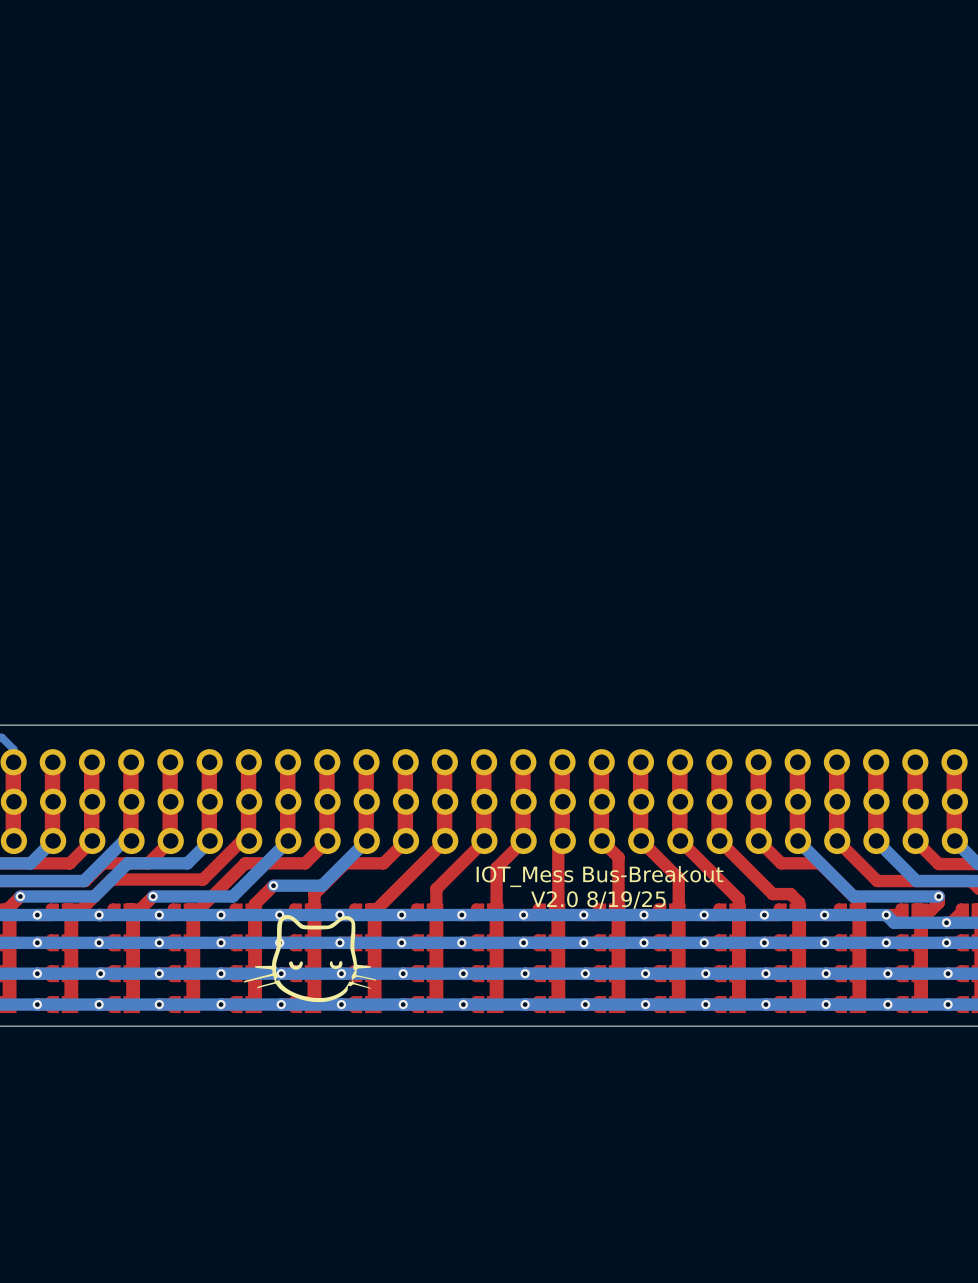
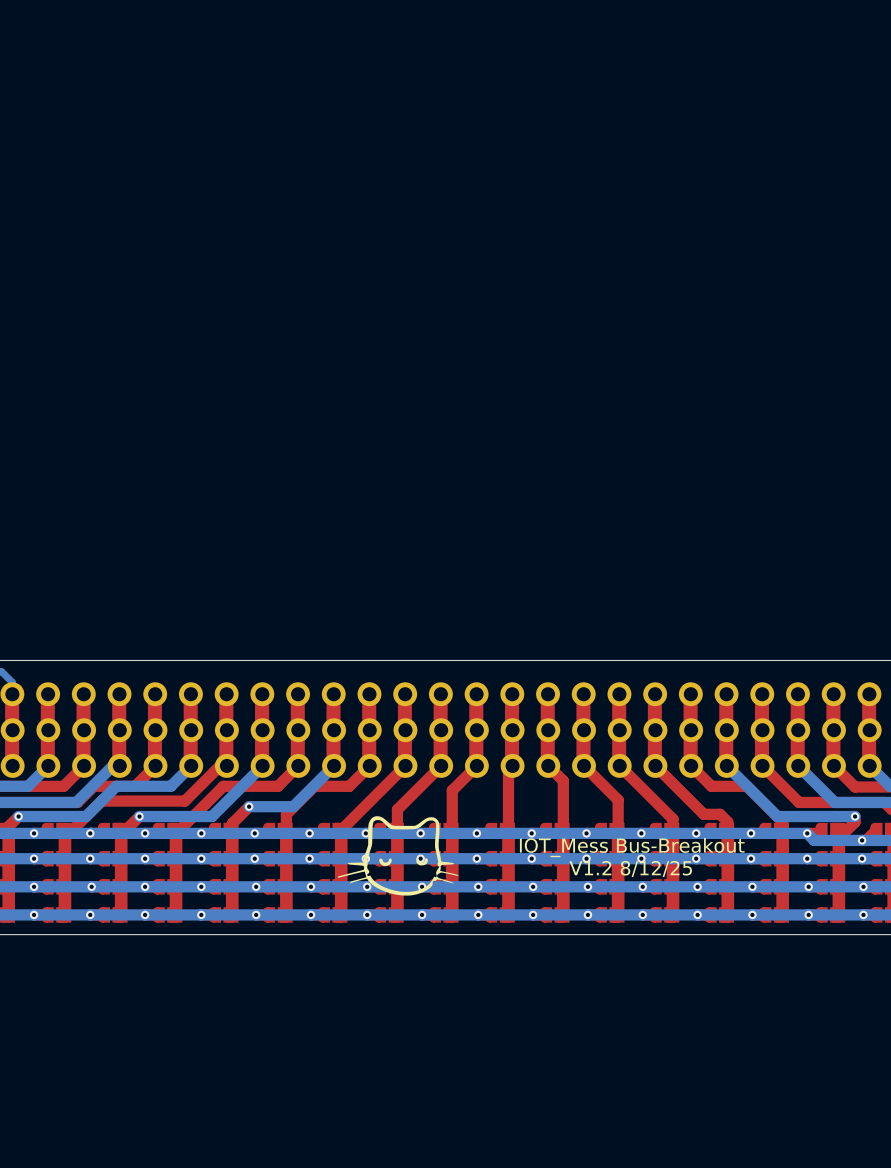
text position: IOT_Mess Bus-Breakout (600, 876) -> IOT_Mess Bus-Breakout (632, 847)
text: V2.0 8/19/25 (598, 900) -> none
text: none -> V1.2 8/12/25 (630, 868)
drawing position: (309, 958) -> (398, 855)

